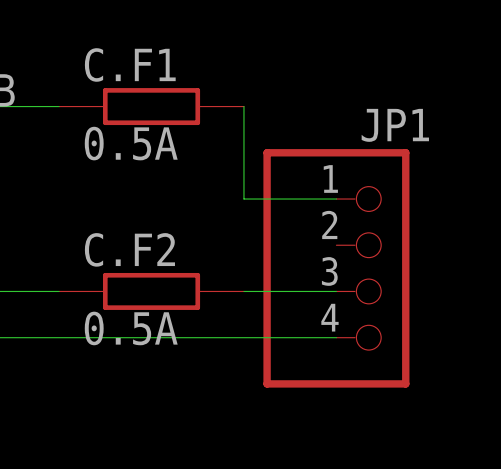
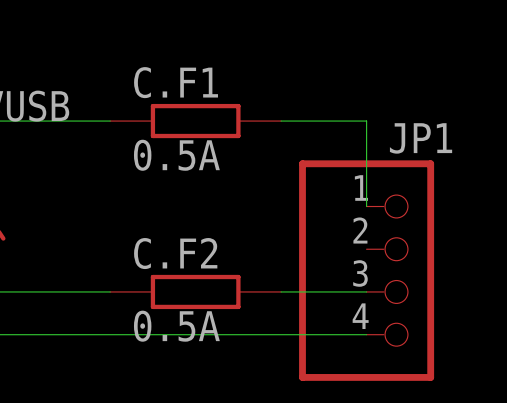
wire: (243, 106) (243, 199) (336, 199) -> (281, 121) (366, 121) (366, 206)

